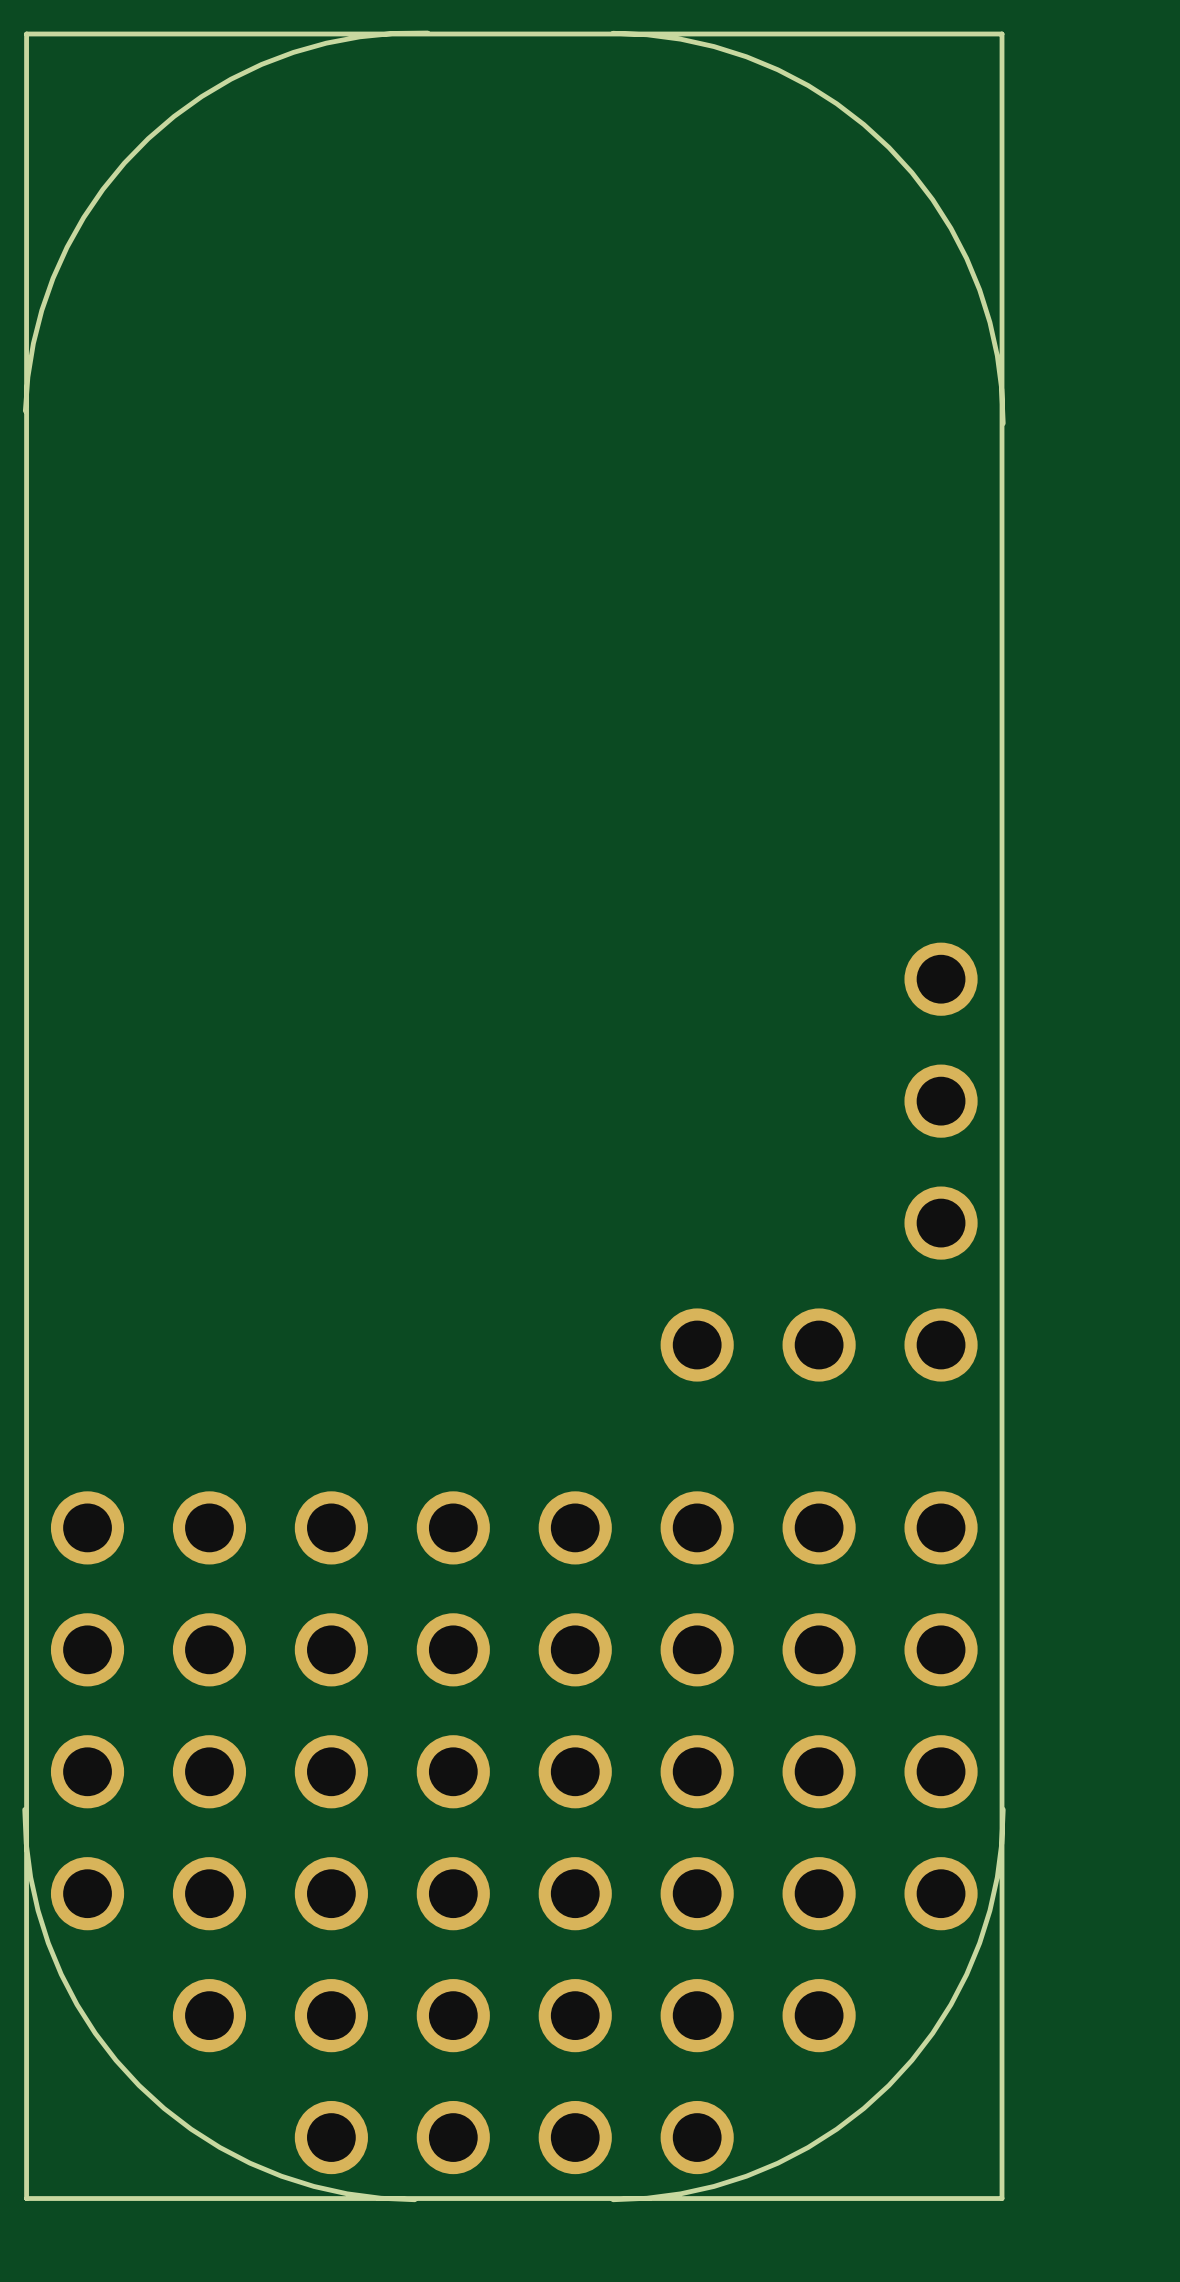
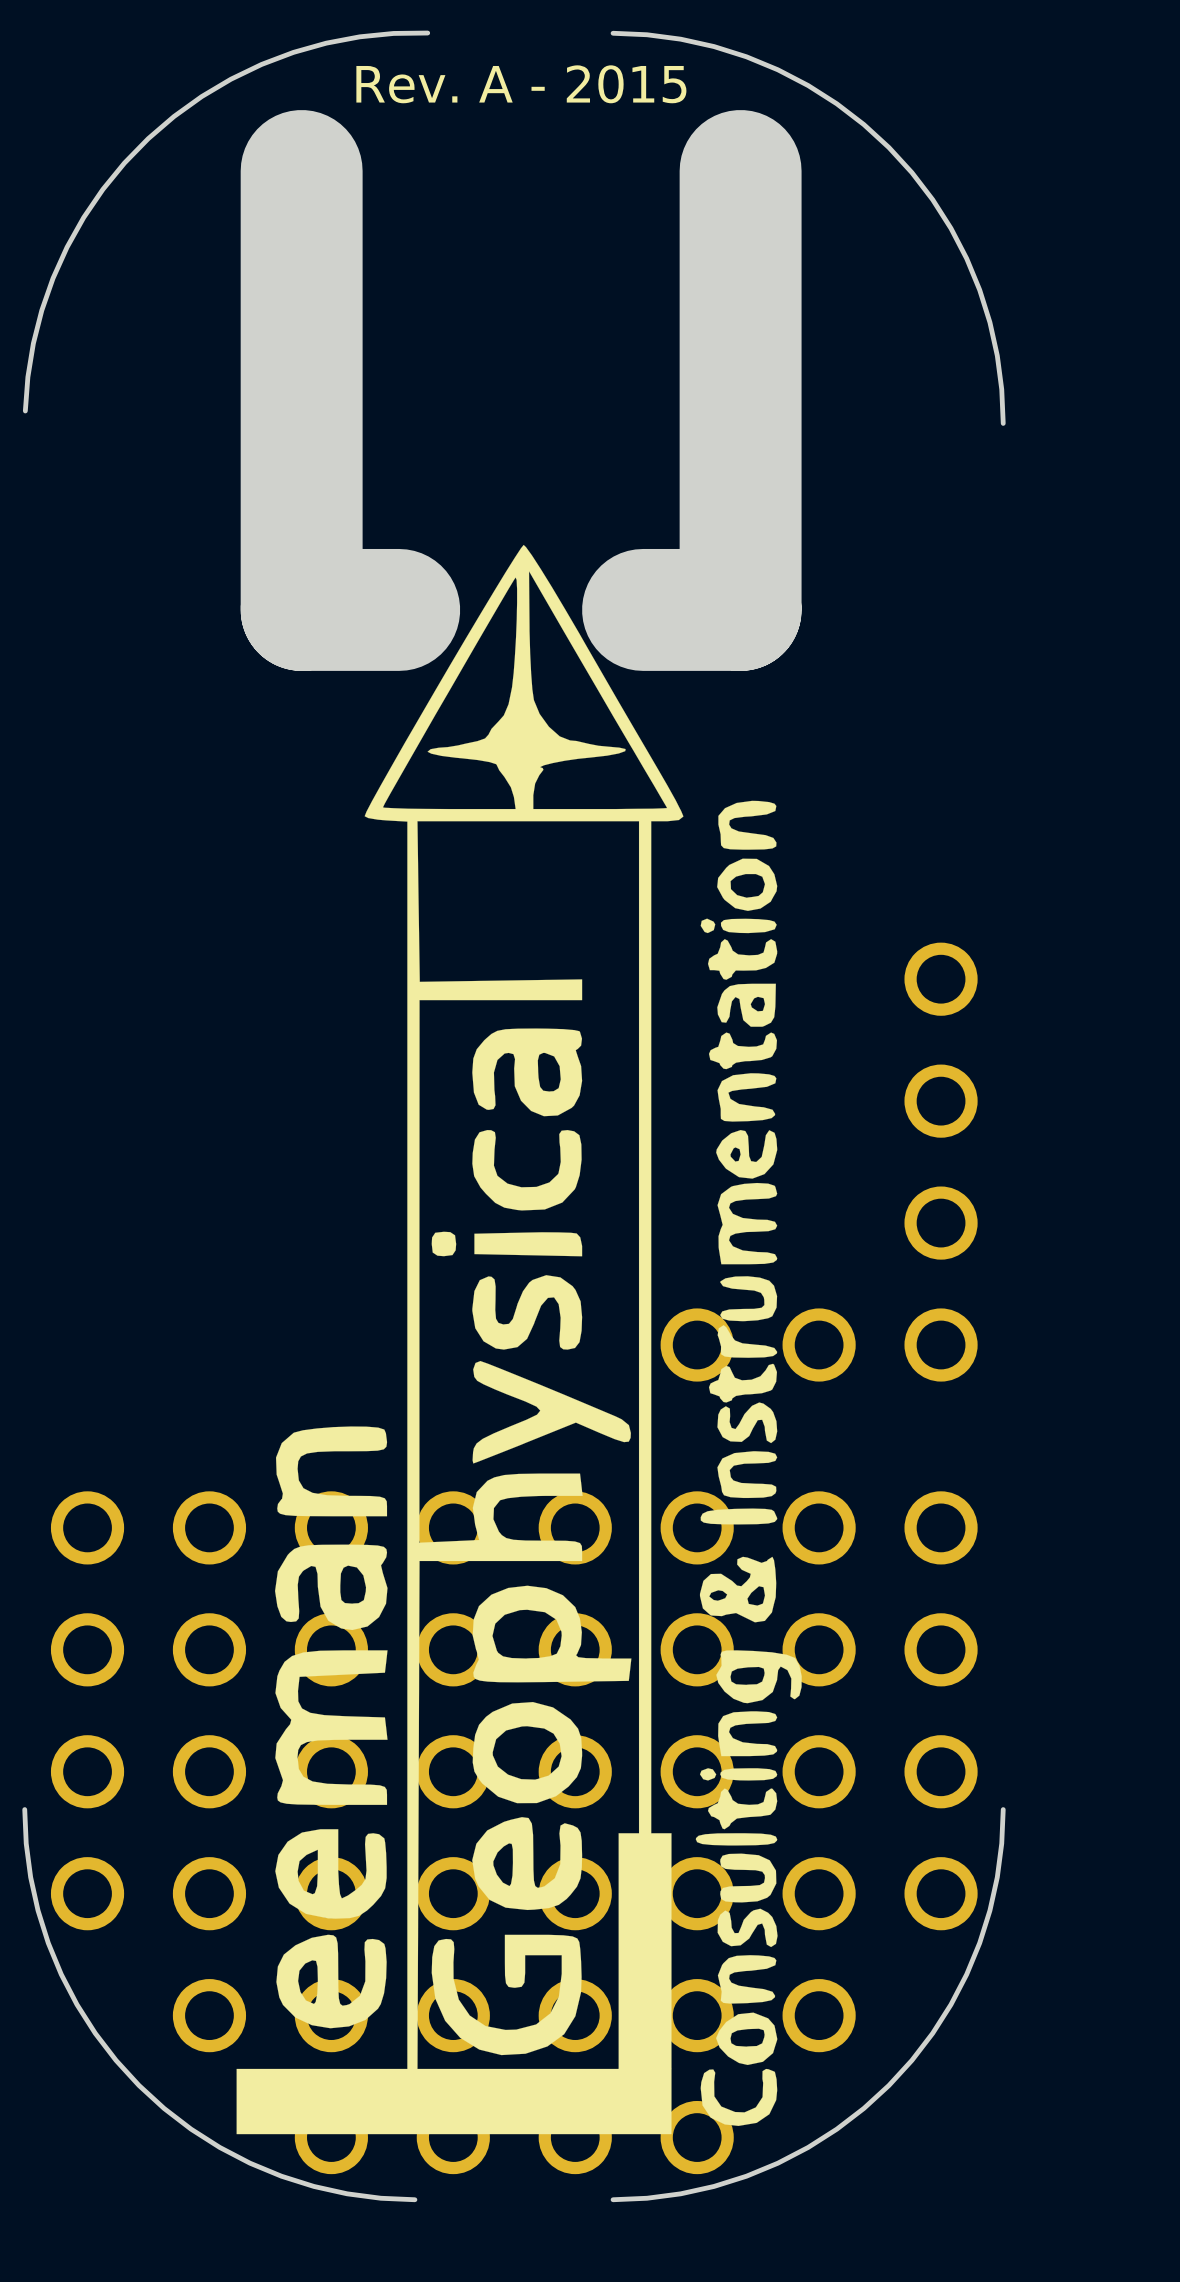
board edge: (1002, 34) (1002, 2198) (26, 2198) (26, 34) (1002, 34) -> none
text: none -> Rev. A - 2015 (521, 84)
board edge: none -> (301, 170) (301, 609) (399, 609)
board edge: none -> (740, 170) (740, 609) (643, 609)
drawing: none -> [236, 544, 802, 2135]

